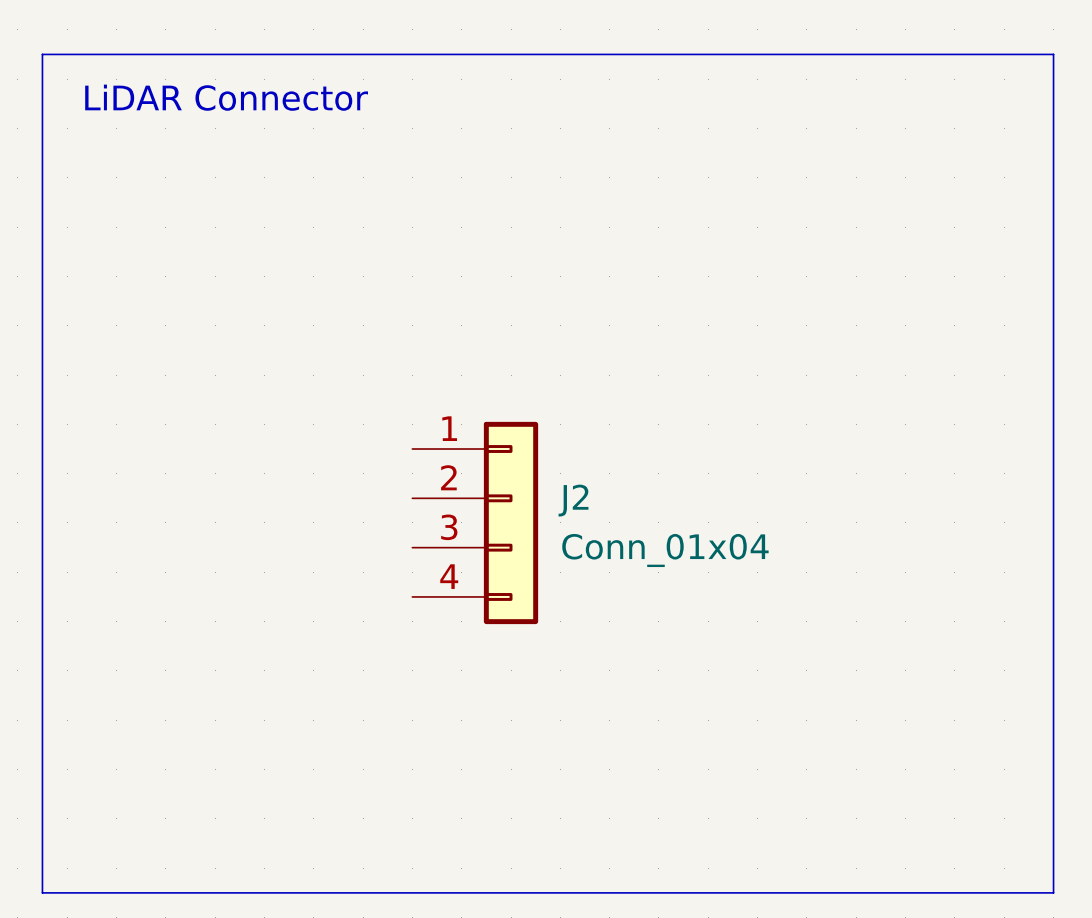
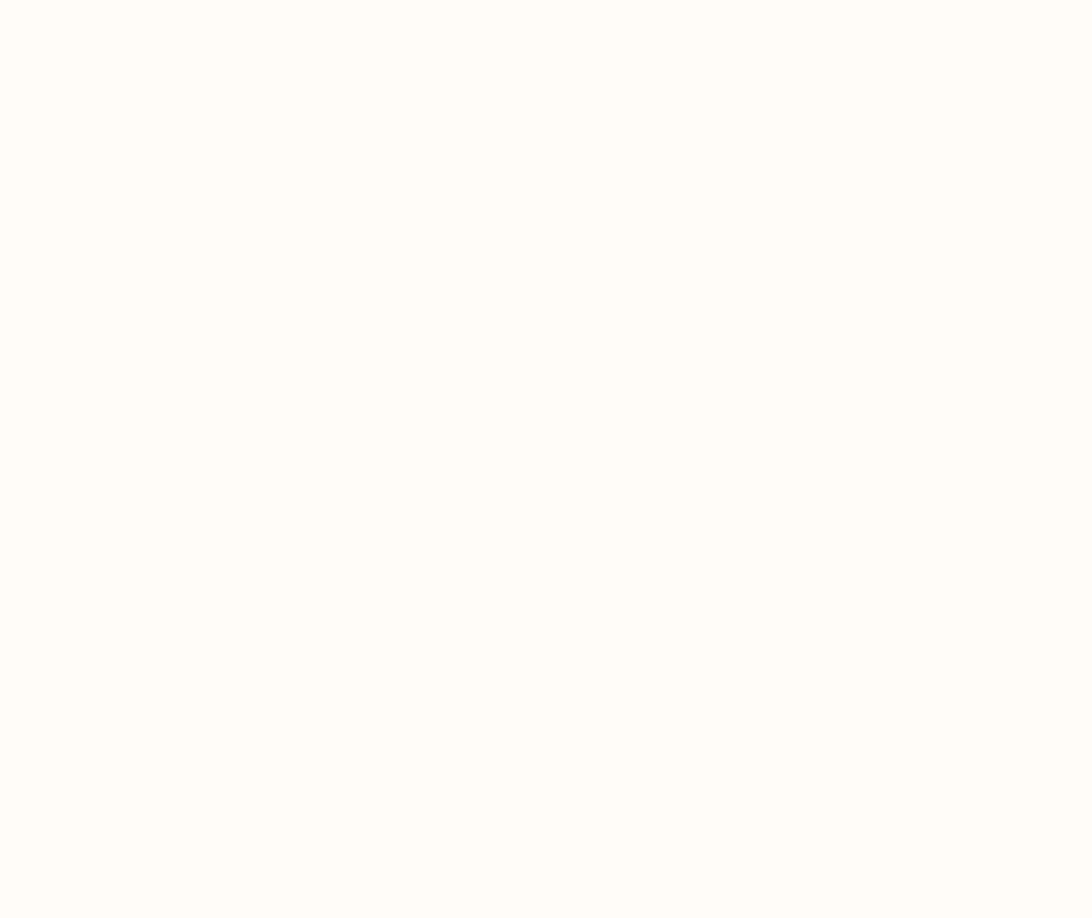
line: (42, 54) (1053, 54) (1053, 892) (42, 892) (42, 54) -> none
text: LiDAR Connector (226, 97) -> none
J2: Conn_01x04 (475, 522) -> none

